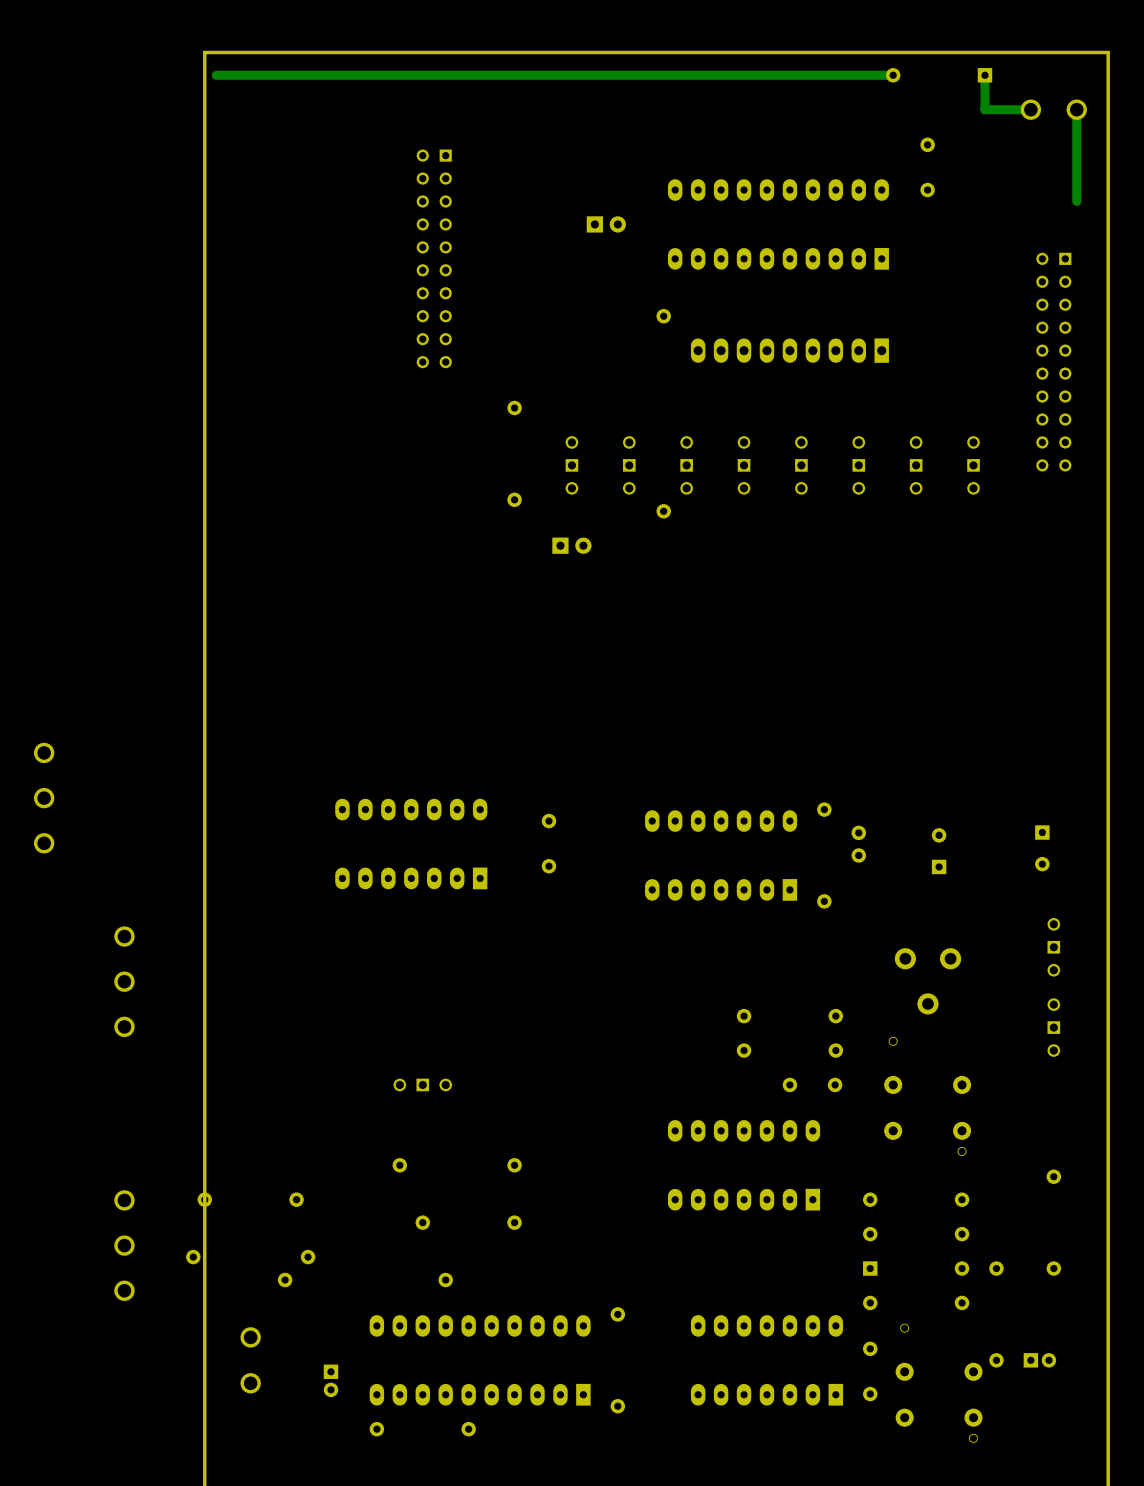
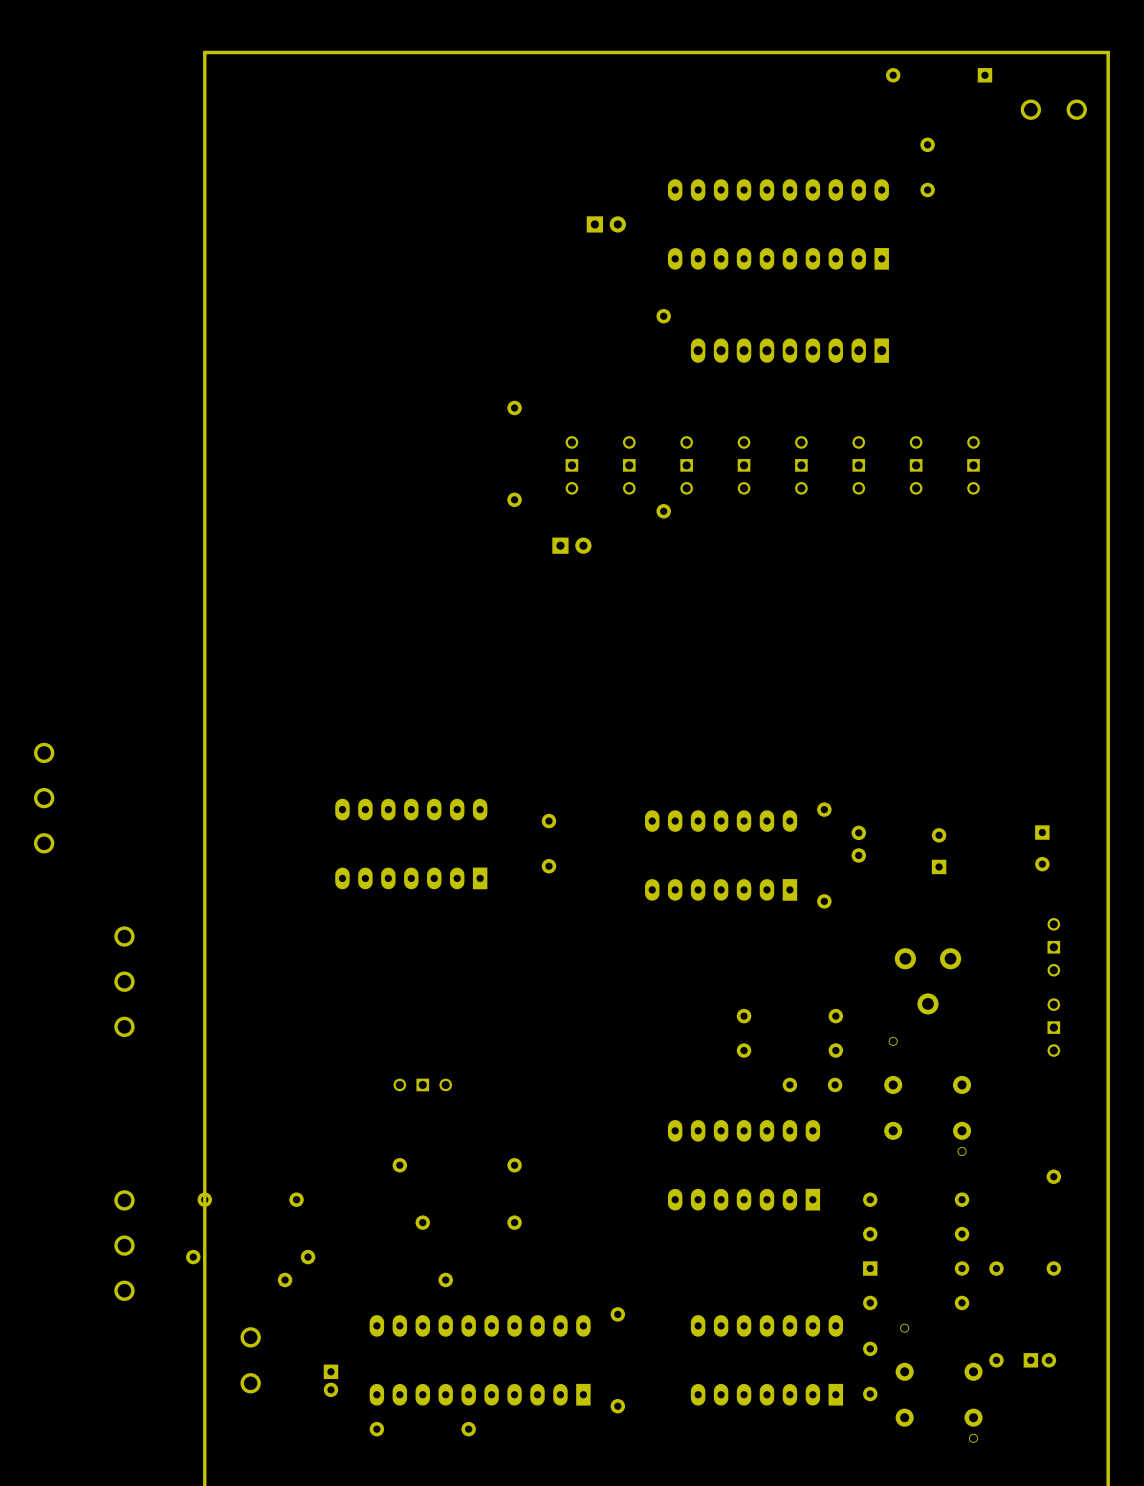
bottom track: (893, 75) (216, 75) -> none
bottom track: (984, 75) (984, 109) (1030, 109) -> none
bottom track: (1076, 109) (1076, 201) -> none
part: (434, 258) -> none
part: (1053, 362) -> none

